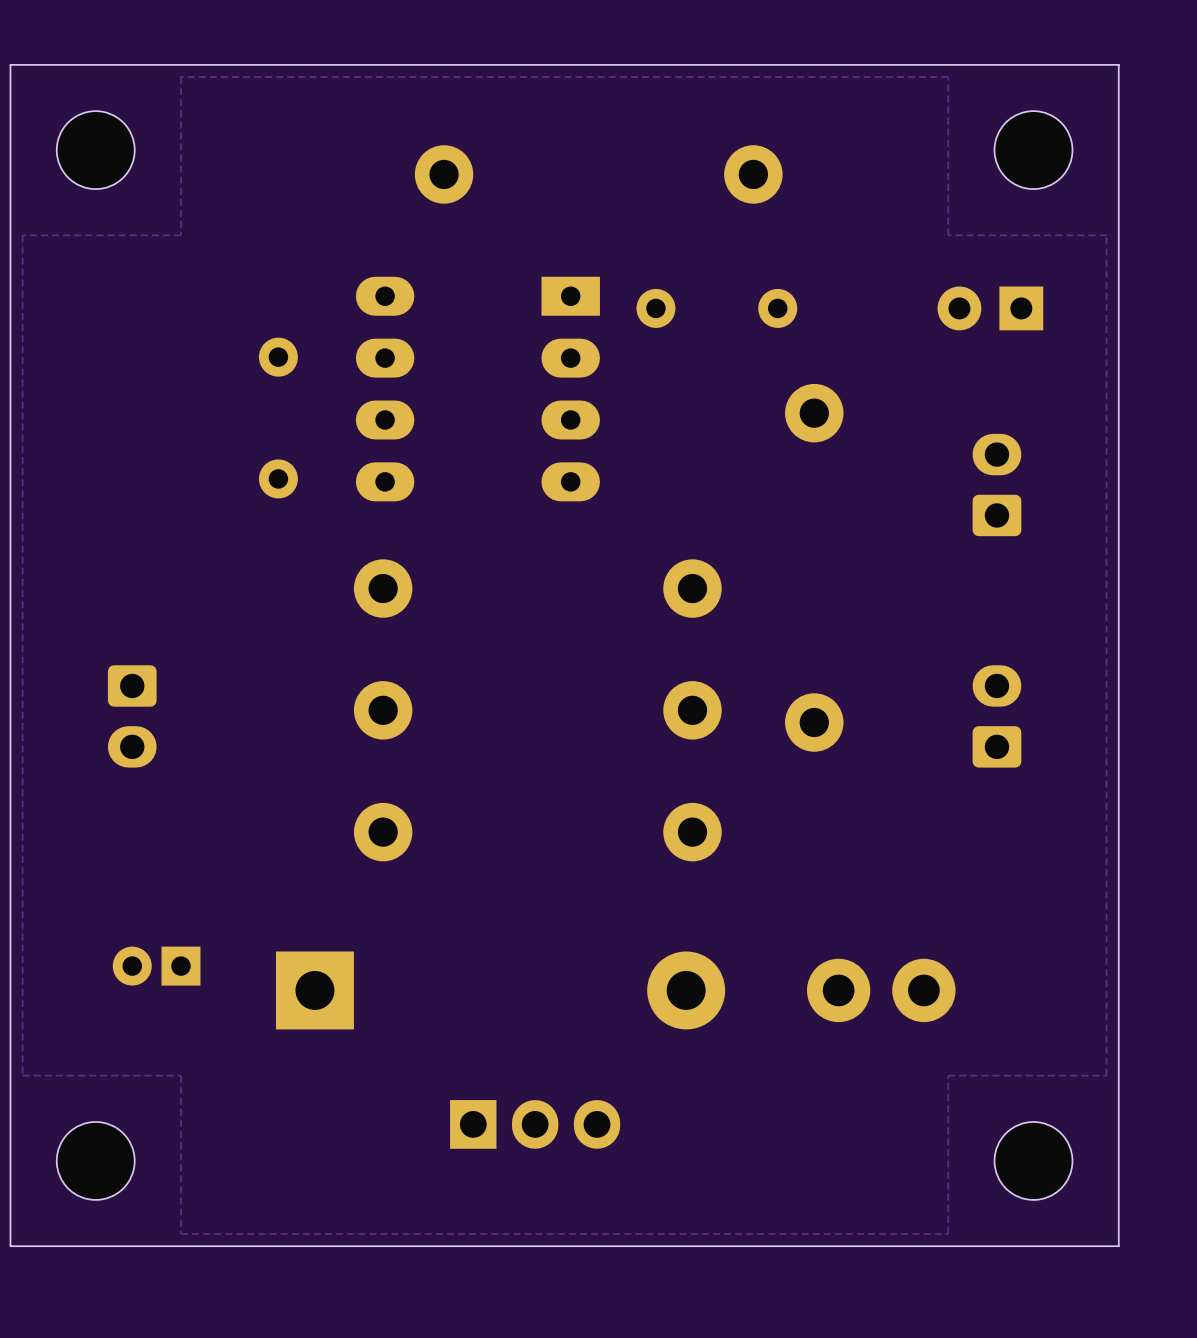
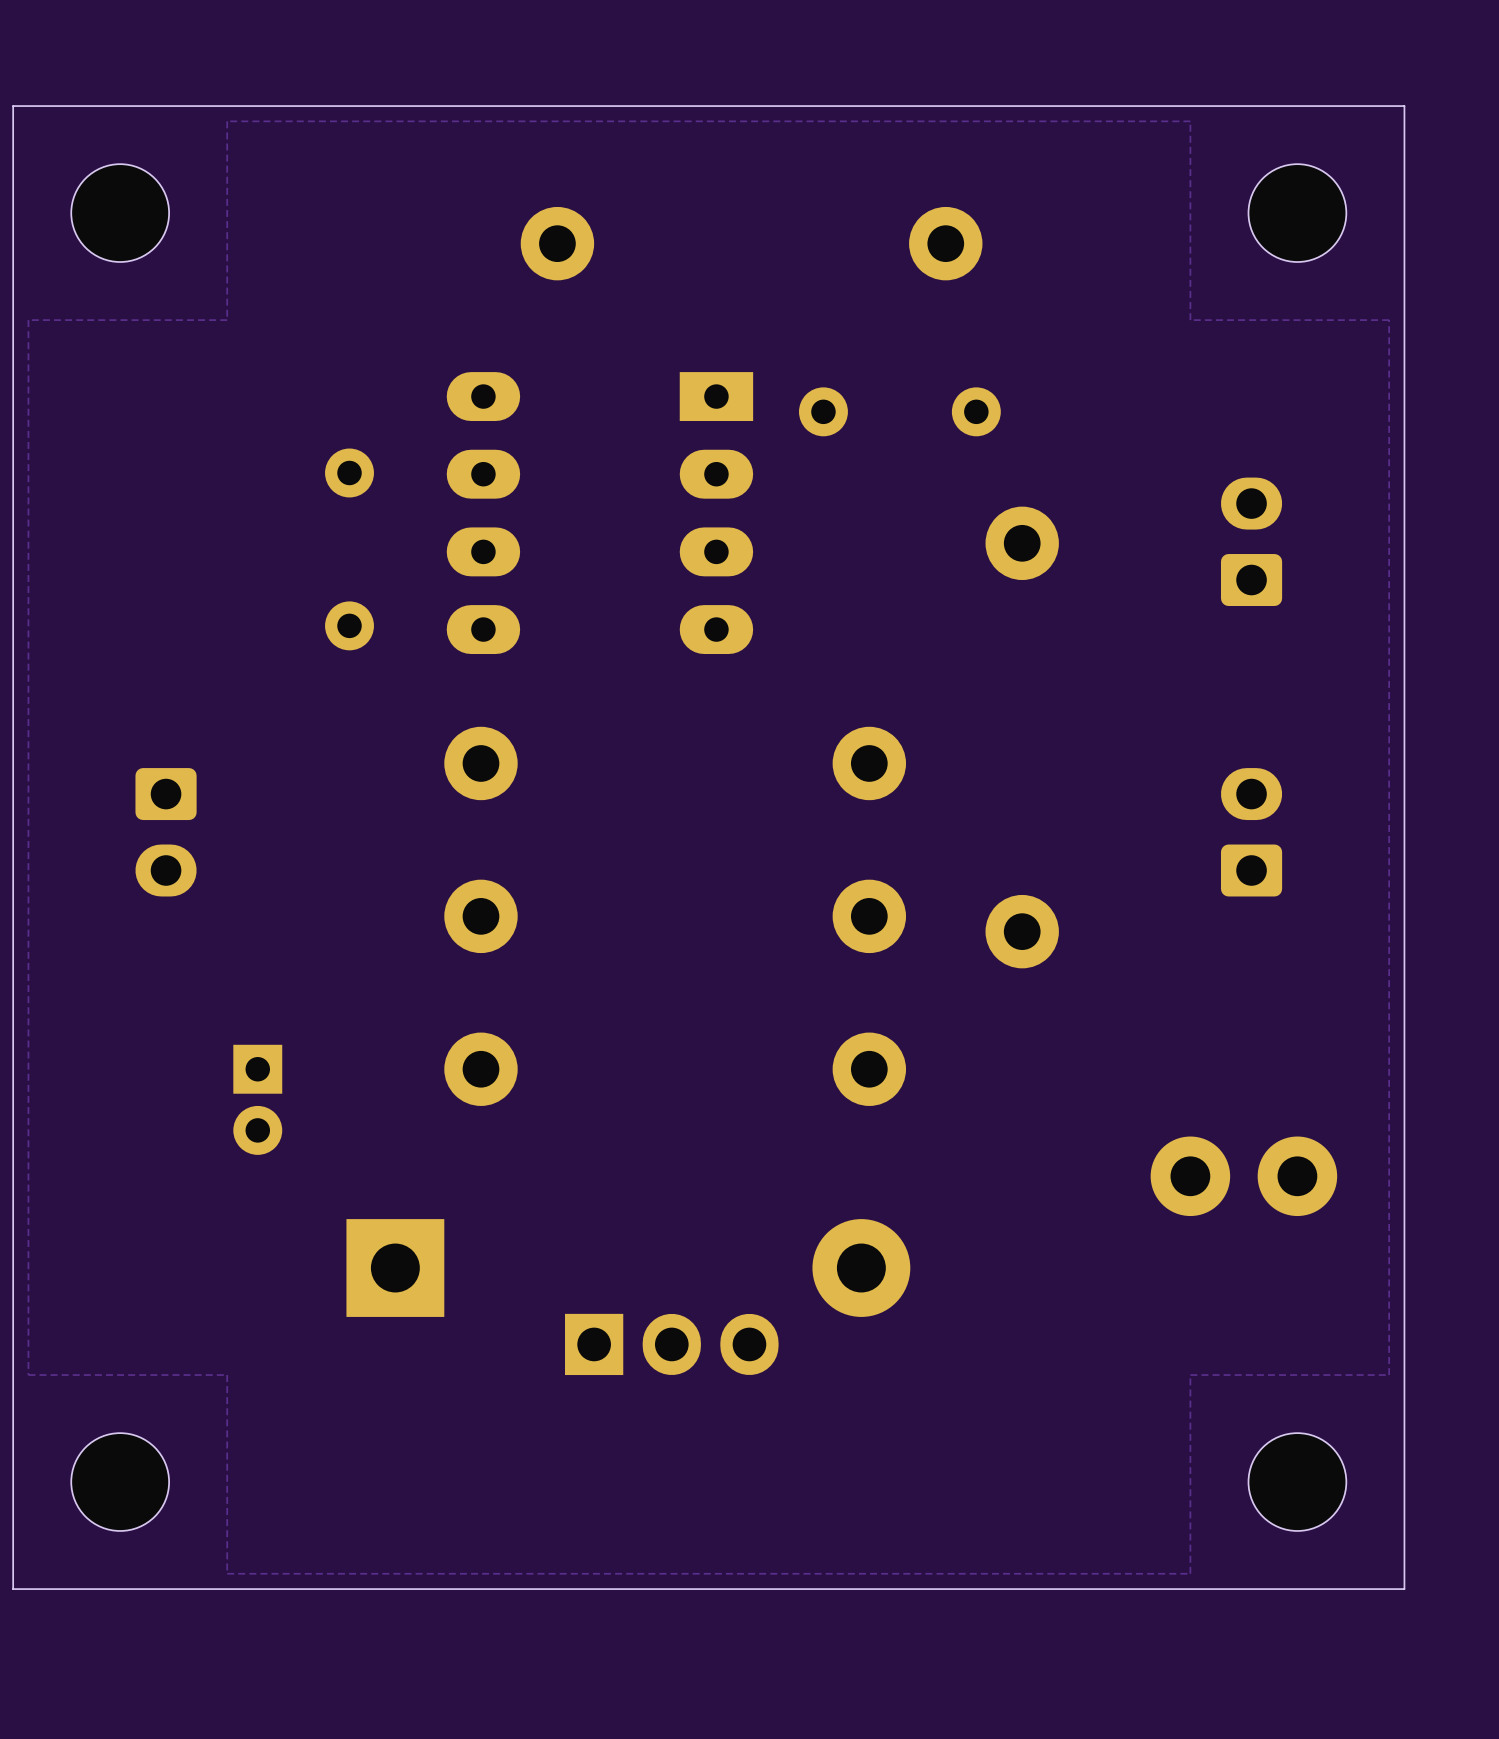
part: (990, 308) -> none
part position: (996, 485) -> (1251, 541)
part position: (132, 716) -> (166, 832)
part position: (996, 716) -> (1251, 832)
part rotation: 0° (156, 966) -> 90° counterclockwise (257, 1099)
part position: (156, 966) -> (257, 1099)
part position: (881, 990) -> (1243, 1176)
part position: (535, 1124) -> (671, 1344)

